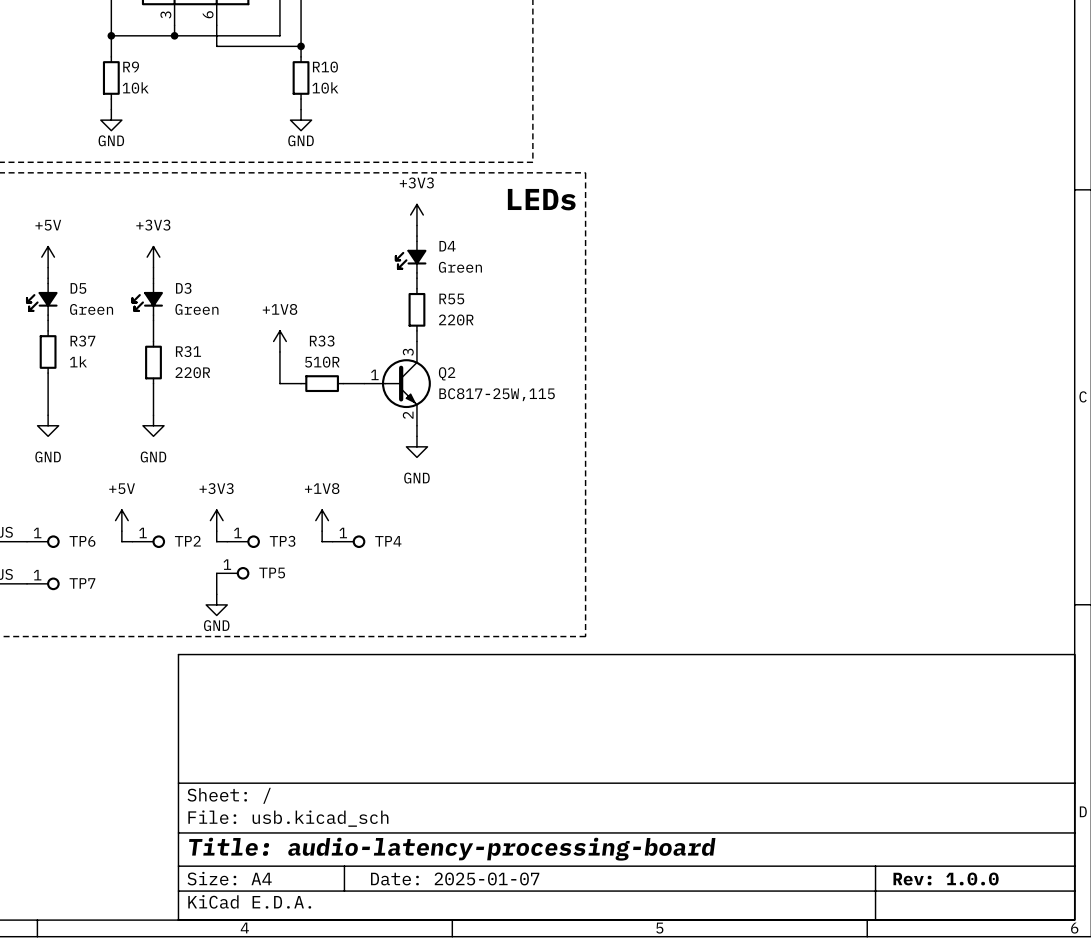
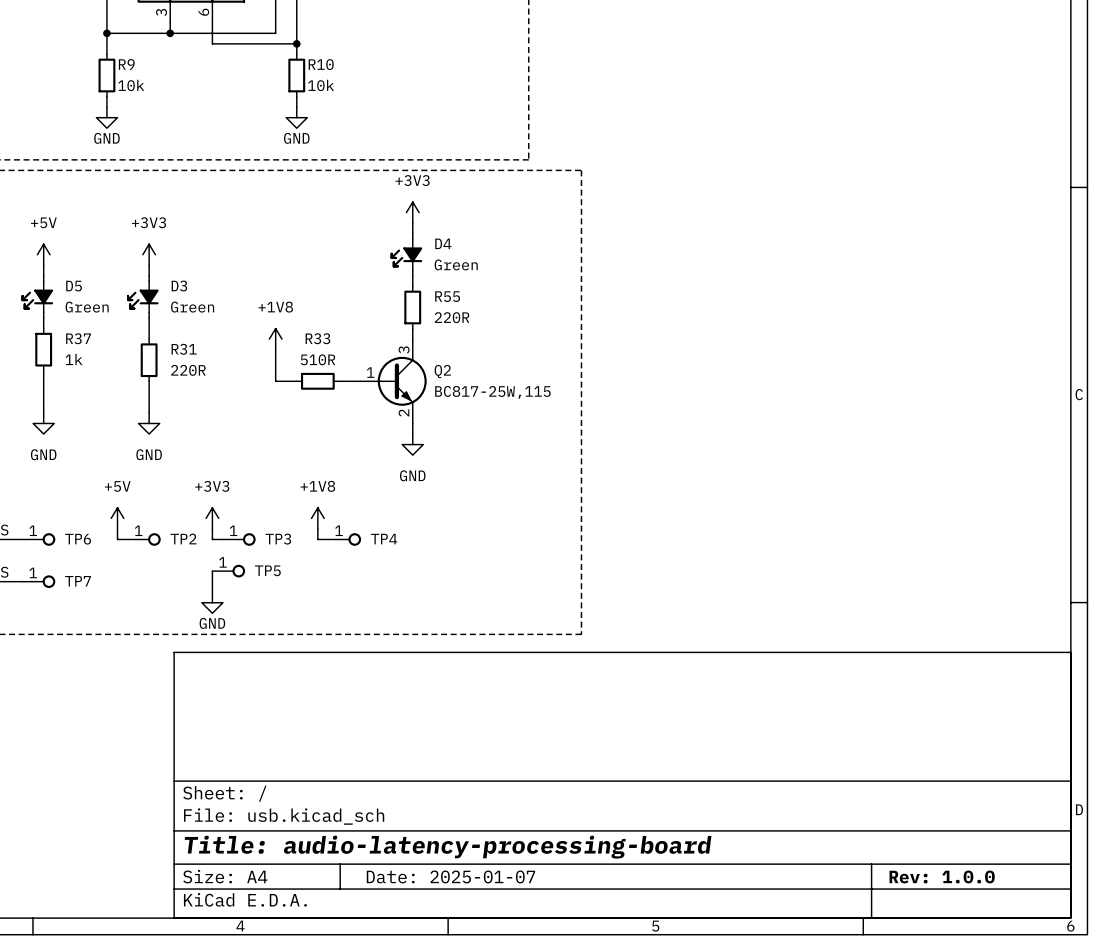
text: LEDs (541, 199) -> none

